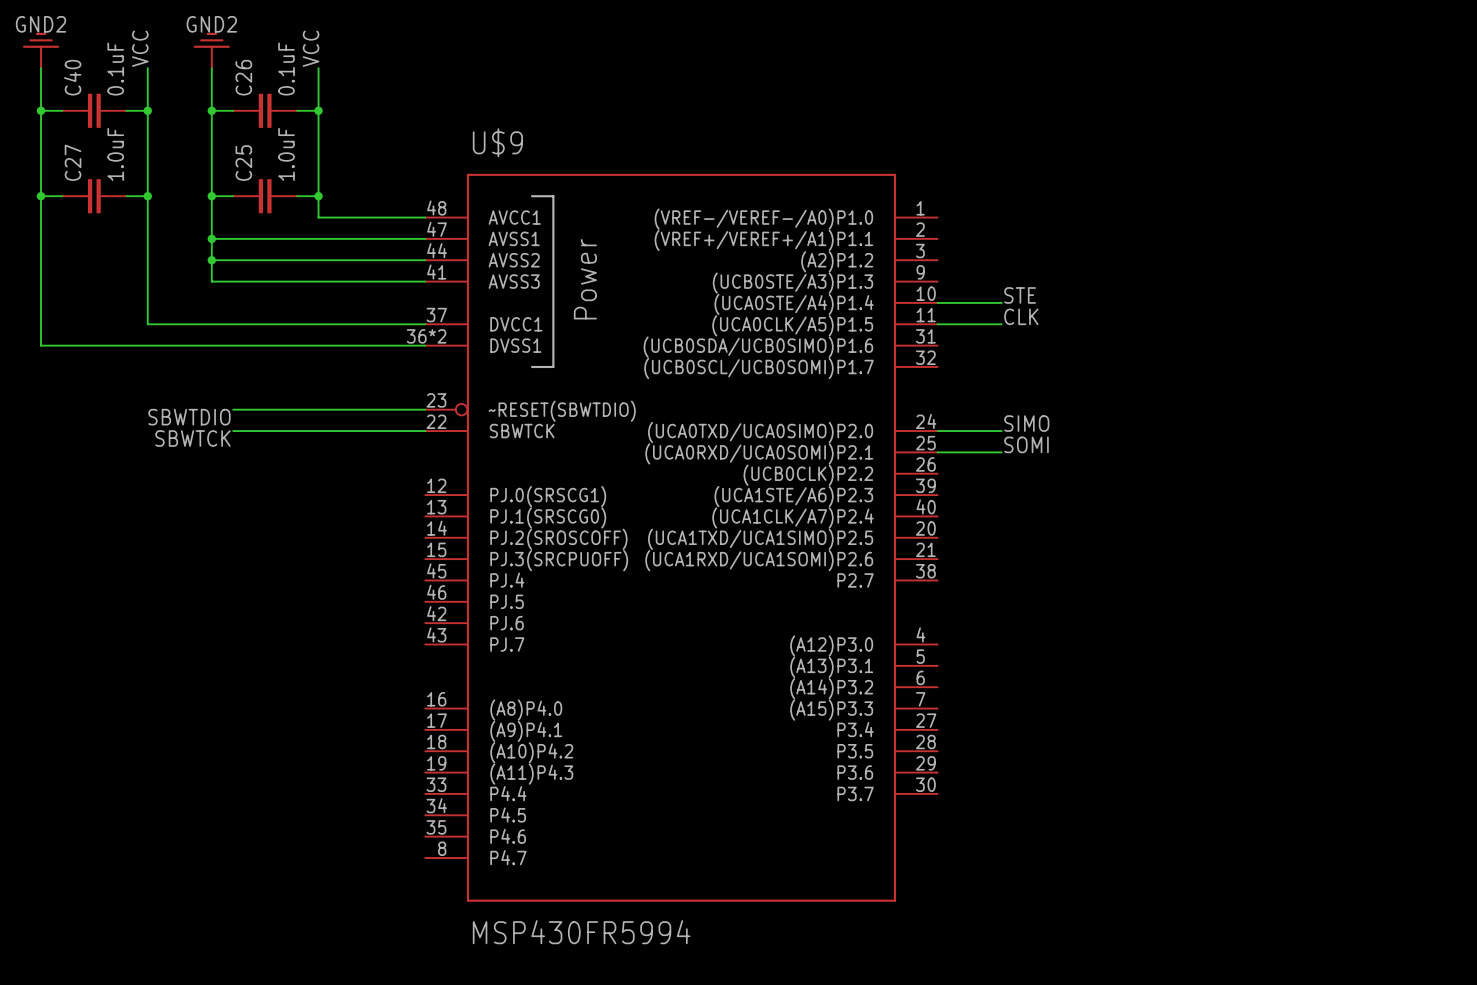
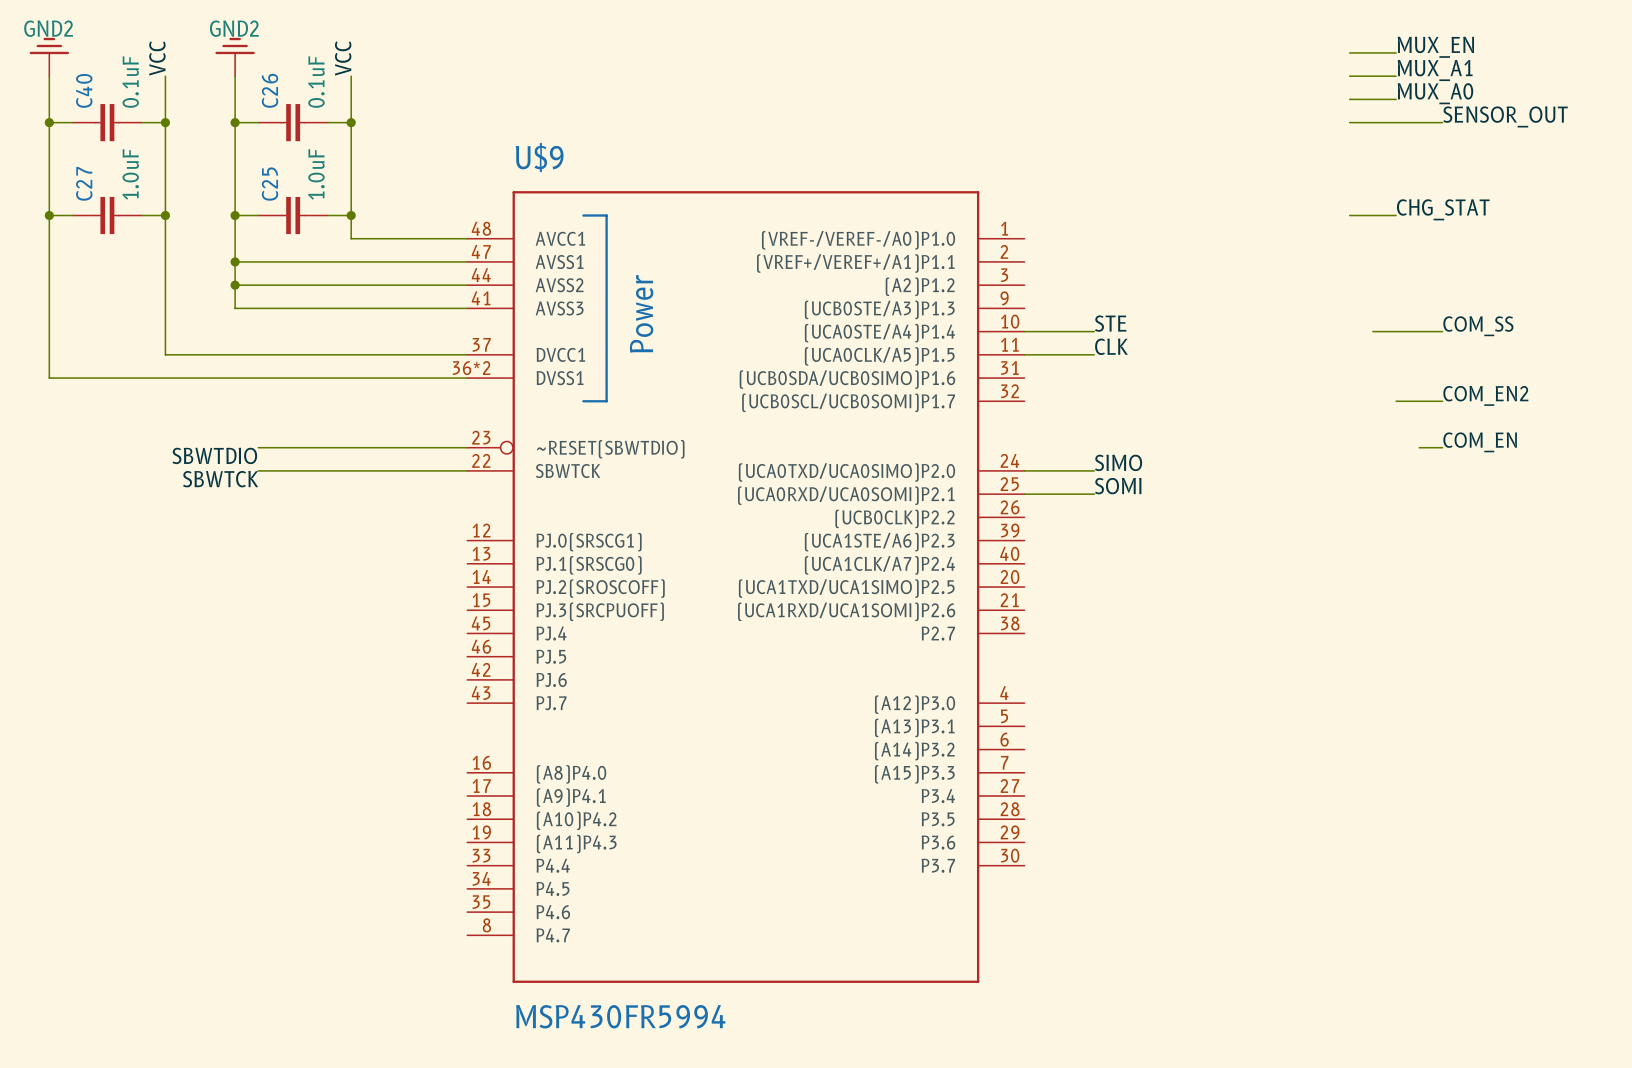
label: none -> MUX_EN (1435, 47)
wire: none -> (1349, 52) (1396, 52)
label: none -> MUX_A1 (1435, 70)
wire: none -> (1349, 76) (1396, 76)
label: none -> MUX_A0 (1435, 93)
wire: none -> (1349, 99) (1396, 99)
label: none -> SENSOR_OUT (1505, 116)
wire: none -> (1349, 122) (1442, 122)
label: none -> CHG_STAT (1443, 209)
wire: none -> (1349, 215) (1396, 215)
label: none -> COM_SS (1478, 326)
wire: none -> (1372, 331) (1442, 331)
label: none -> COM_EN2 (1485, 395)
wire: none -> (1396, 401) (1442, 401)
label: none -> COM_EN (1480, 442)
wire: none -> (1419, 447) (1442, 447)

